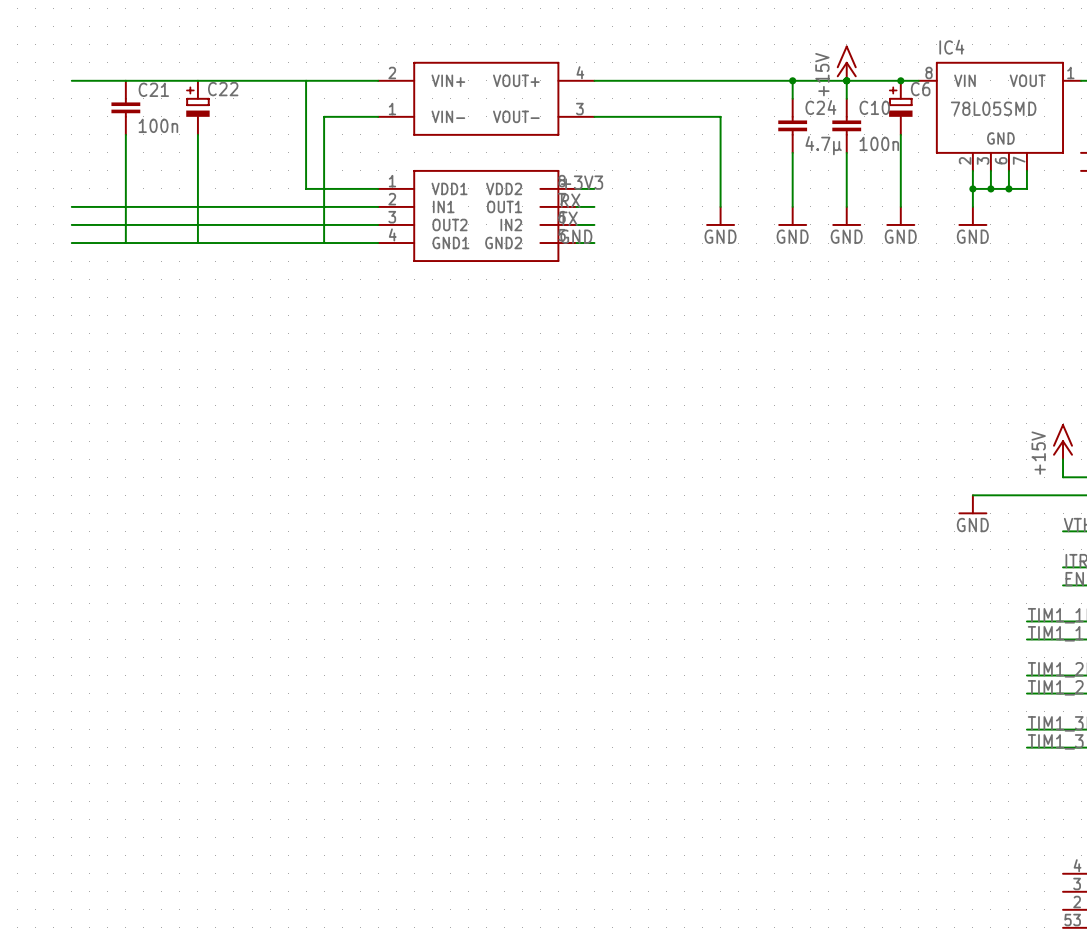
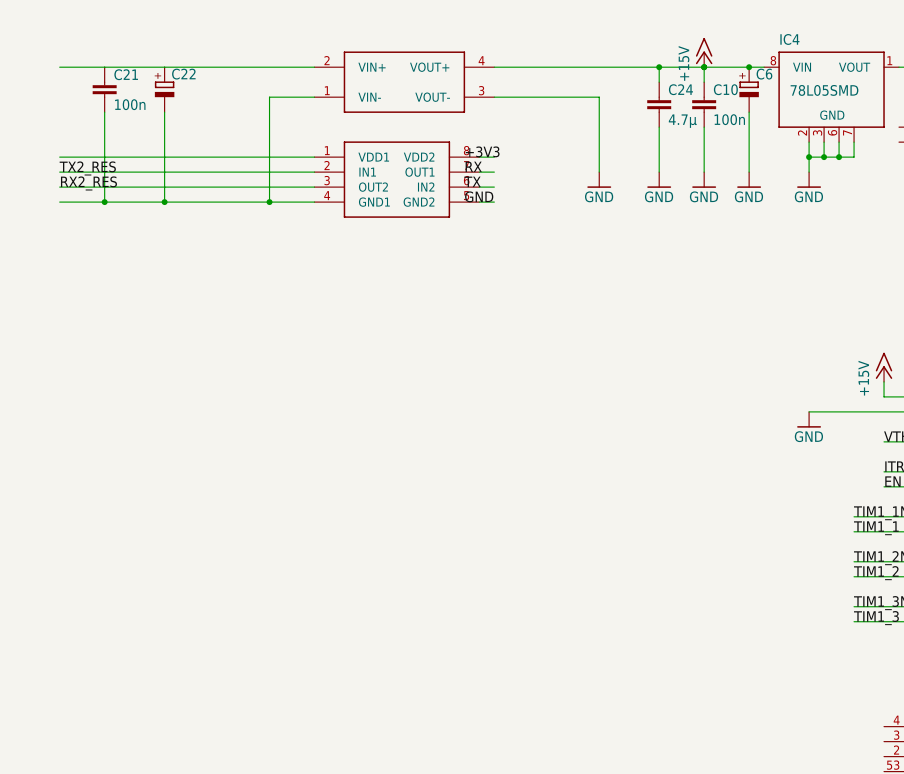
wire: (306, 80) (306, 188) -> (59, 157) (254, 157)
part symbol: [378, 170, 577, 262] -> [314, 141, 480, 218]
label: none -> TX2_RES (87, 168)
label: none -> RX2_RES (88, 183)
junction: none -> (104, 202)
junction: none -> (164, 202)
junction: none -> (269, 202)

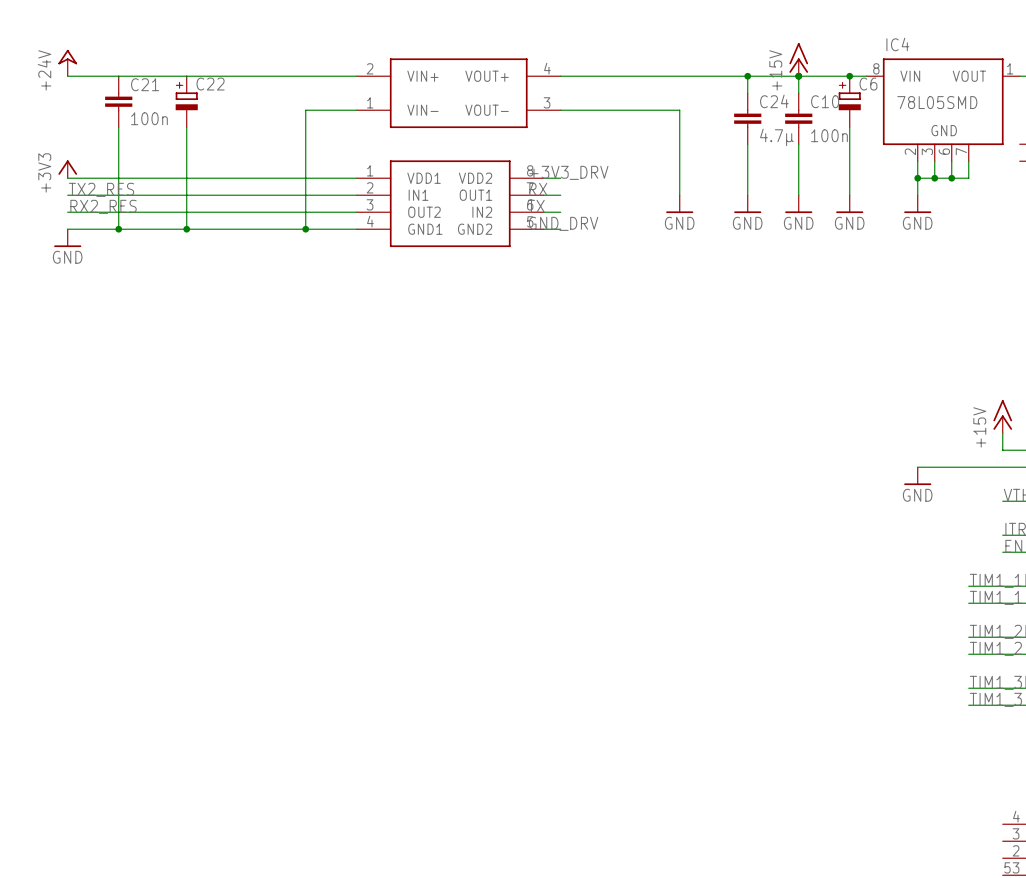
power symbol: none -> +24V (67, 63)
power symbol: none -> +3V3 (67, 169)
label: +3V3 (482, 151) -> +3V3_DRV (568, 172)
label: GND (479, 196) -> GND_DRV (563, 223)
power symbol: none -> GND (67, 238)

